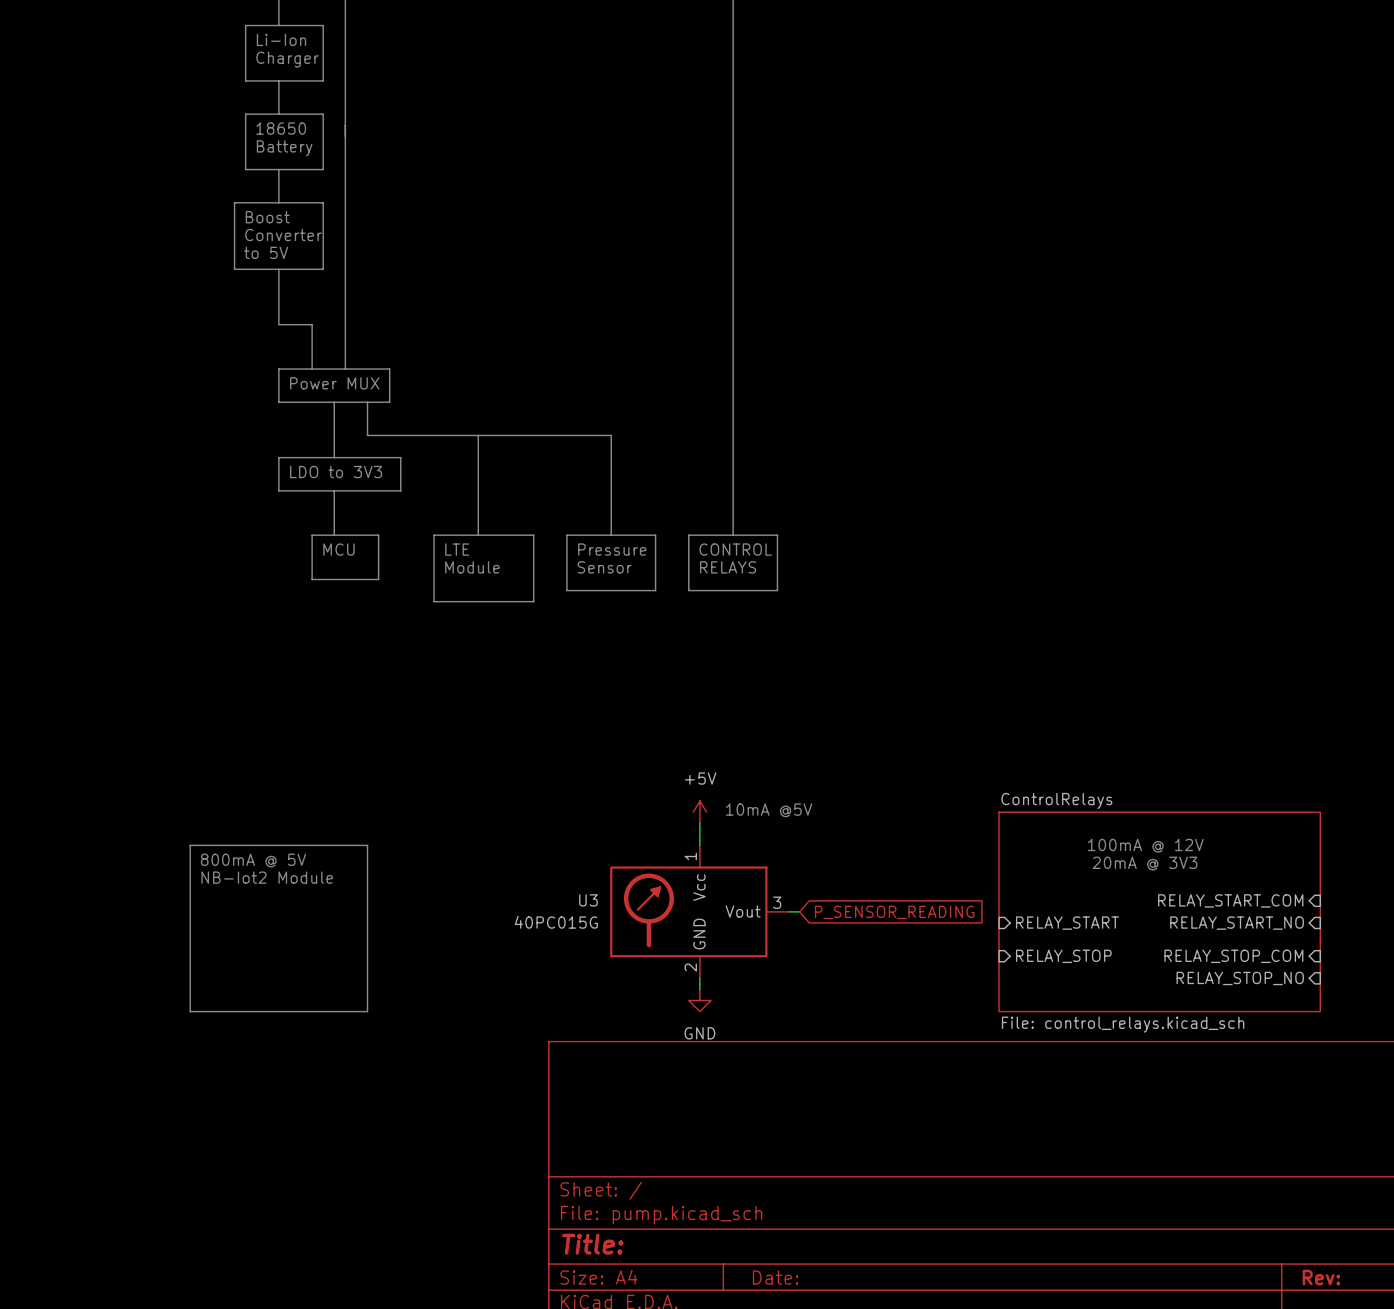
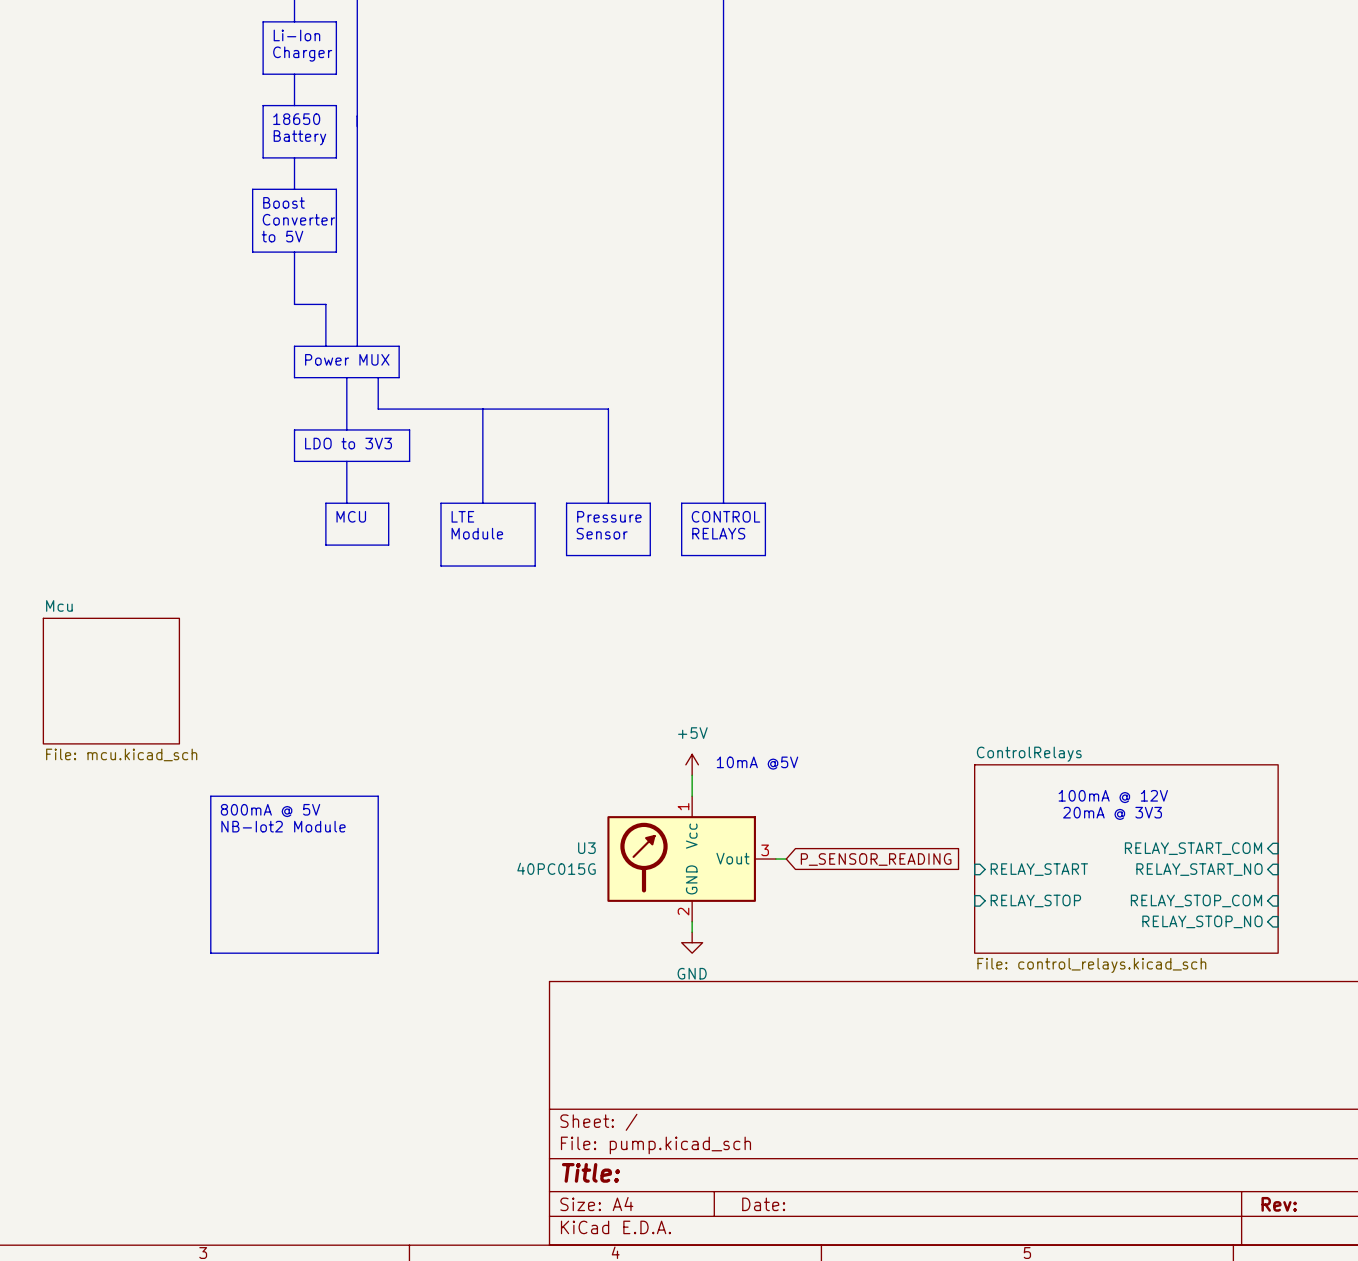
sheet Mcu: none -> File: mcu.kicad_sch (111, 681)

